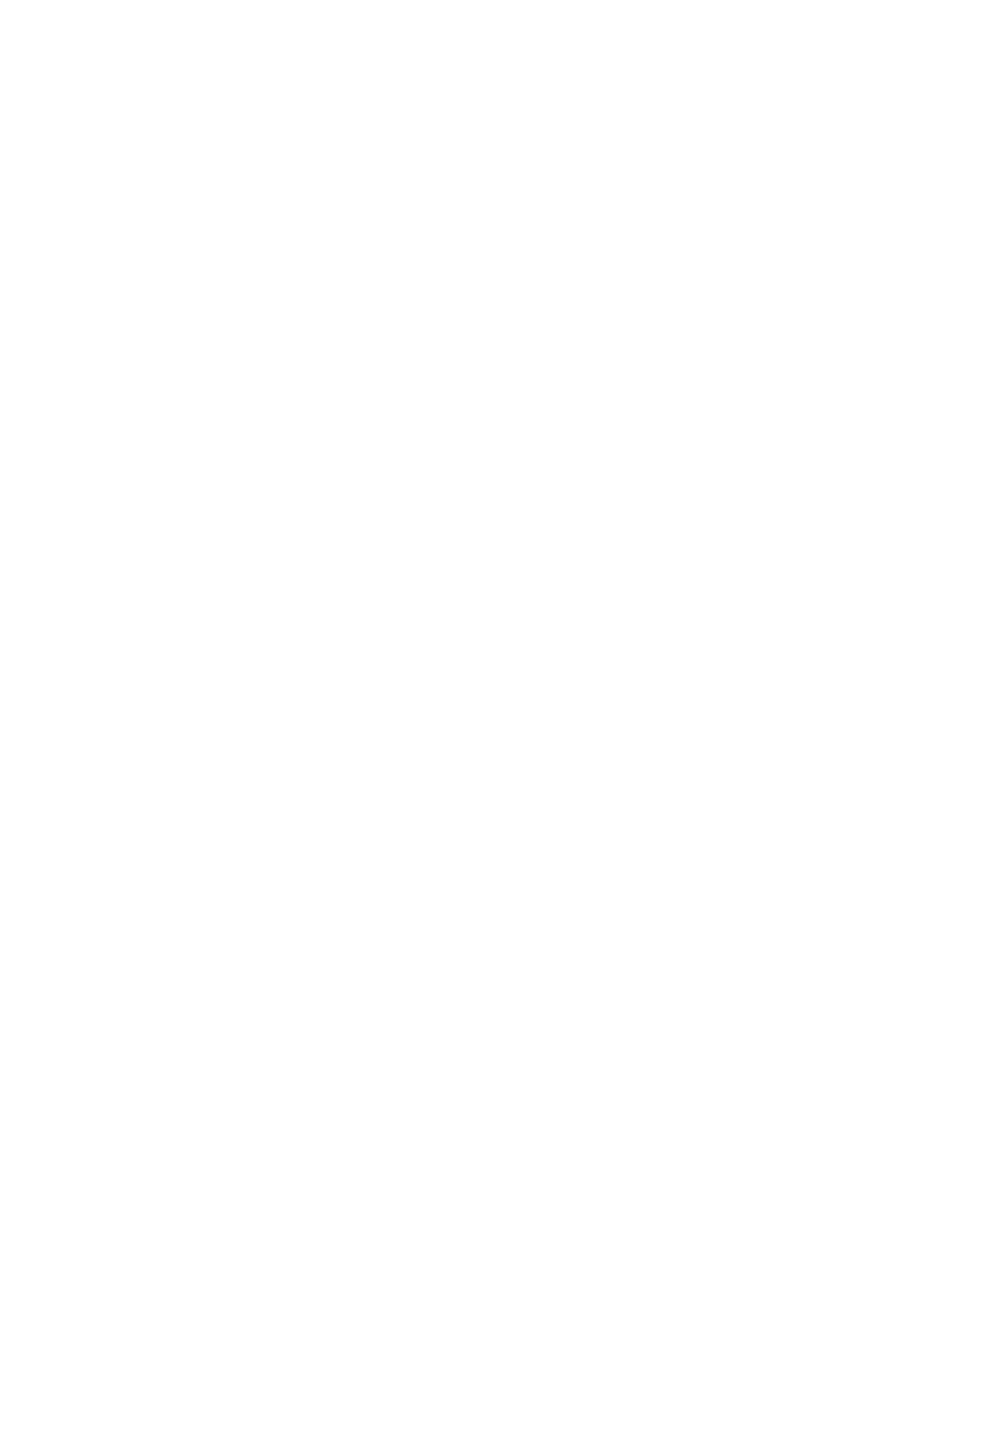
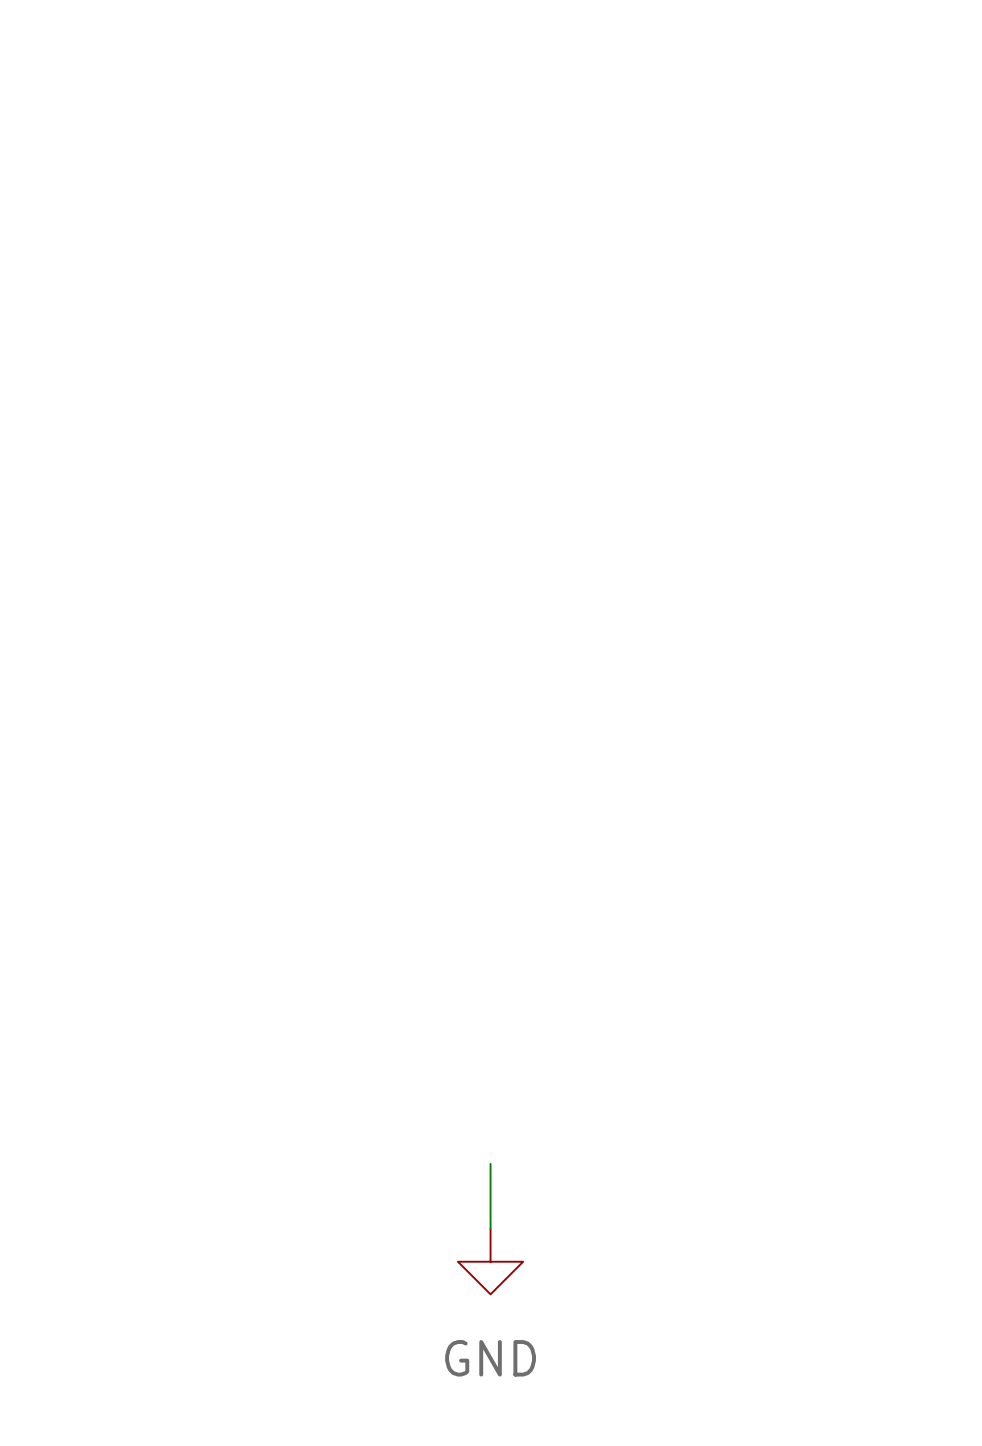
wire: none -> (490, 1163) (490, 1229)
power symbol: none -> GND (490, 1261)

